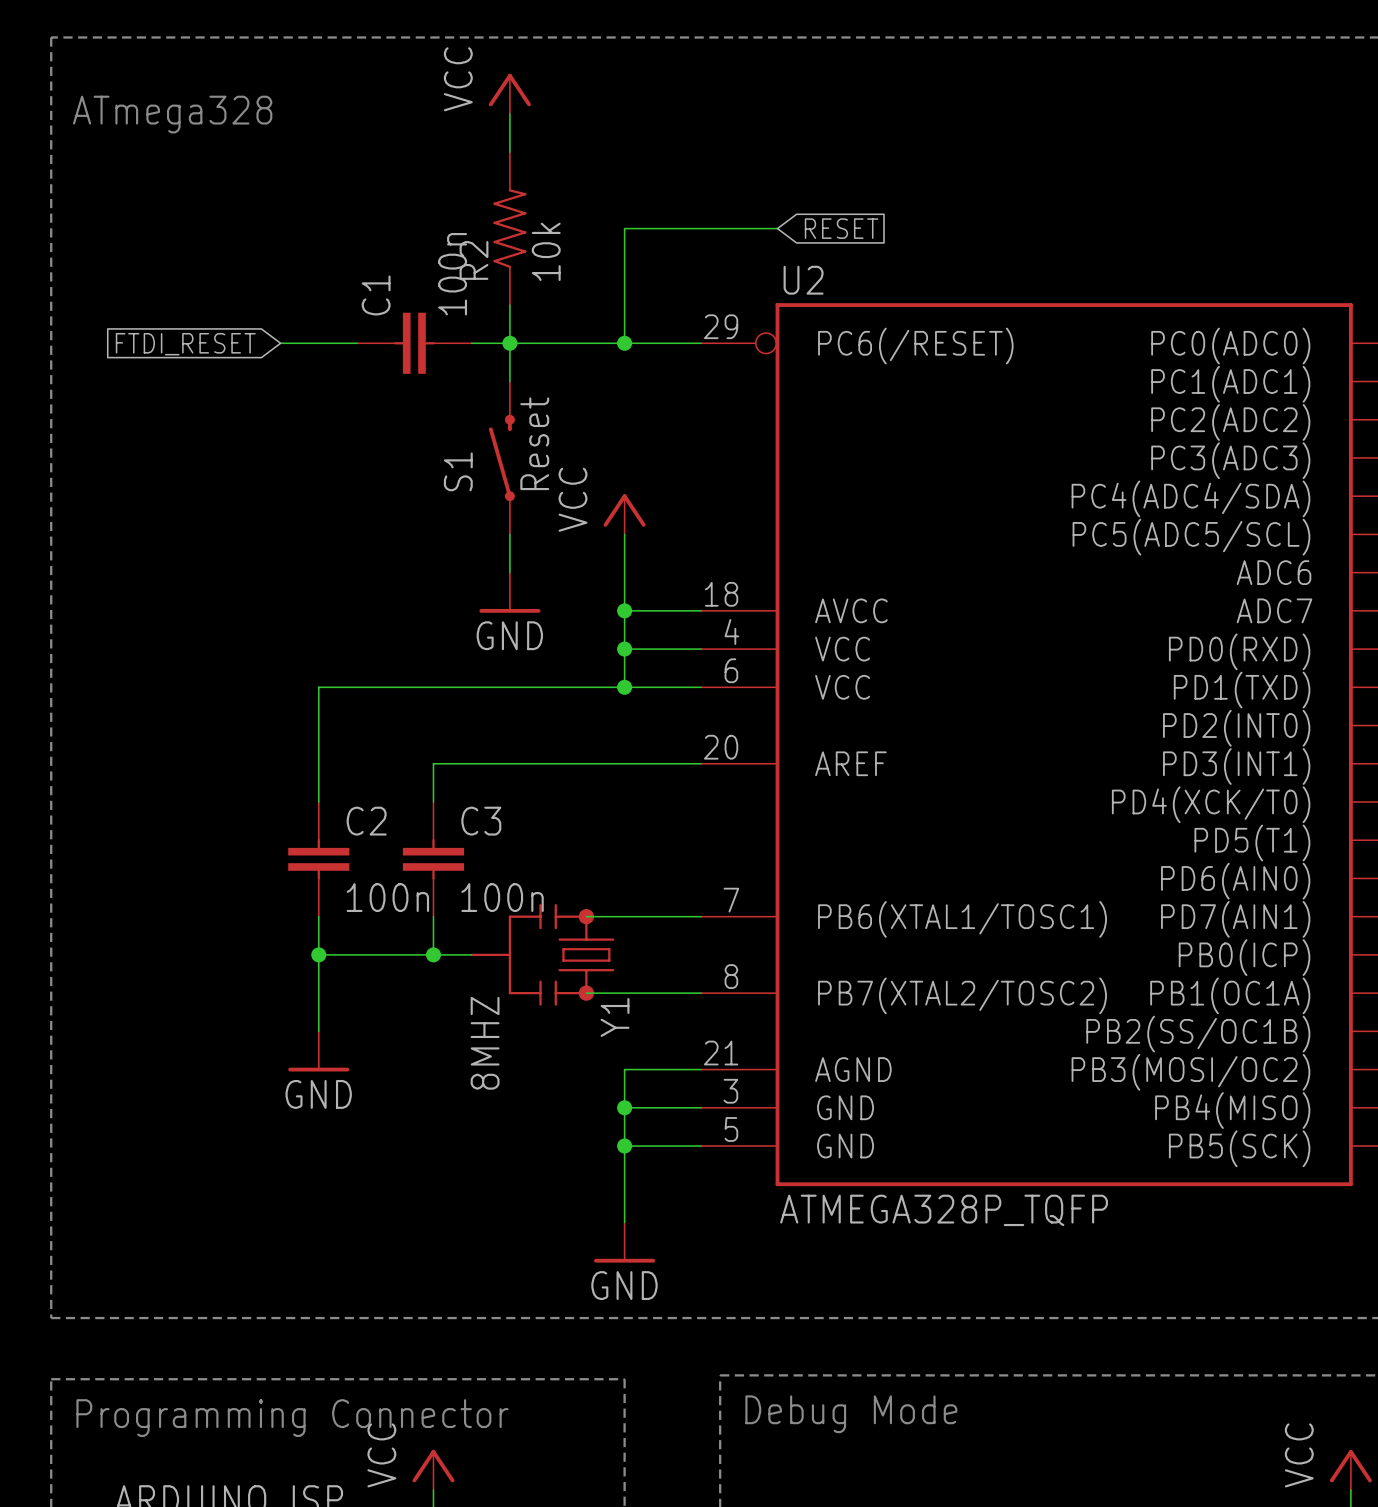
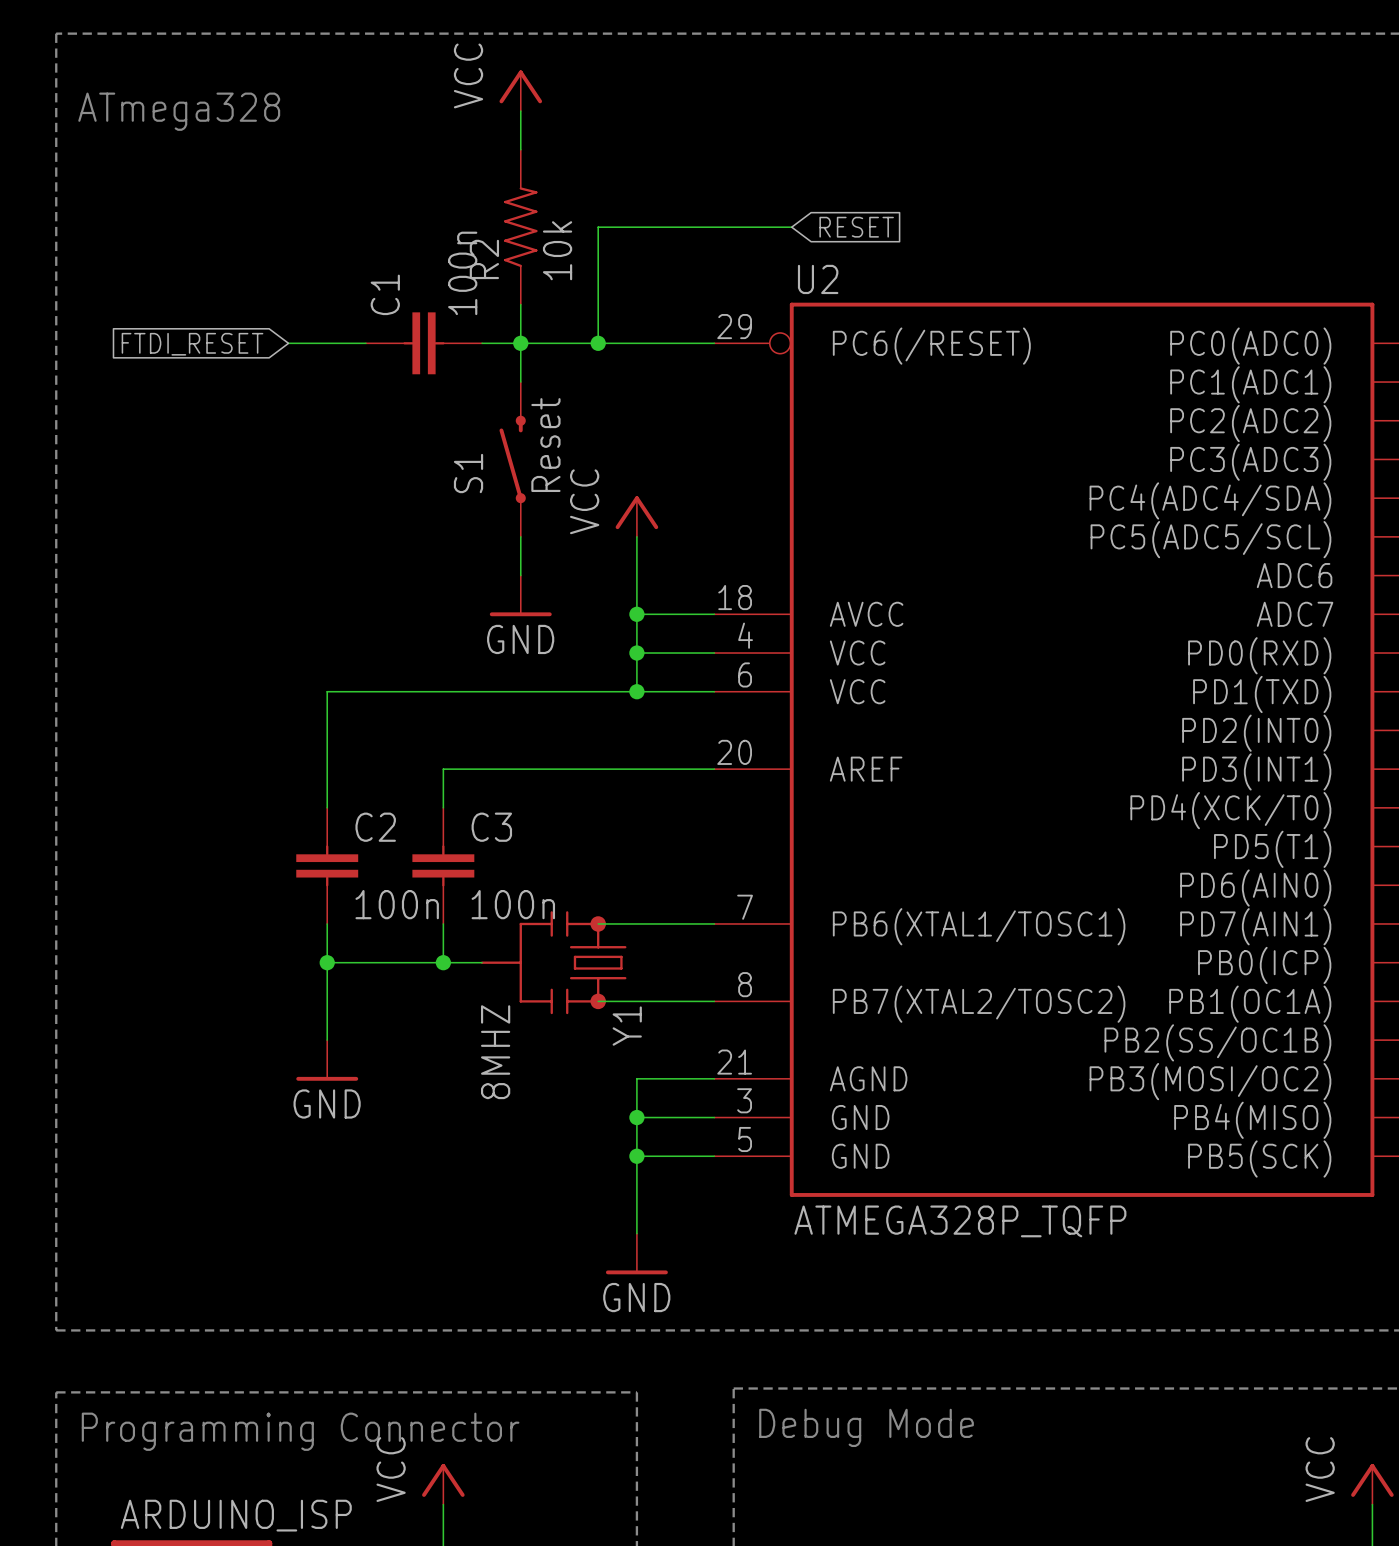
wire: (624, 228) (624, 343) -> (636, 227) (598, 227) (598, 343)
junction position: (624, 343) -> (598, 343)

